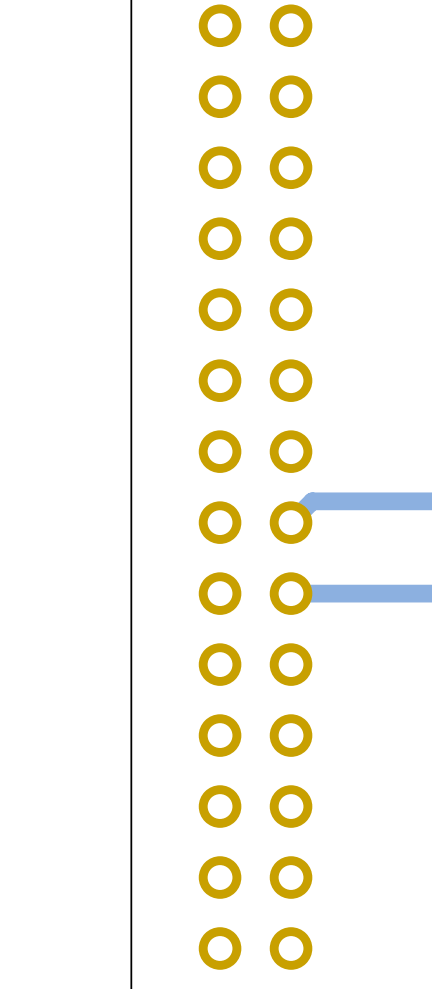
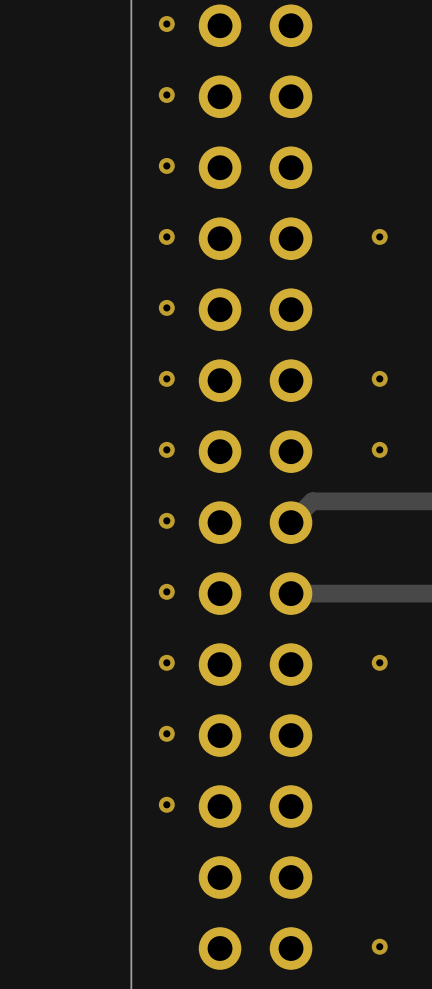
via: none -> (166, 24)
via: none -> (166, 94)
via: none -> (166, 165)
via: none -> (166, 236)
via: none -> (379, 236)
via: none -> (166, 307)
via: none -> (166, 378)
via: none -> (379, 378)
via: none -> (166, 449)
via: none -> (379, 449)
via: none -> (166, 520)
via: none -> (166, 591)
via: none -> (166, 662)
via: none -> (379, 662)
via: none -> (166, 733)
via: none -> (166, 804)
via: none -> (379, 946)

